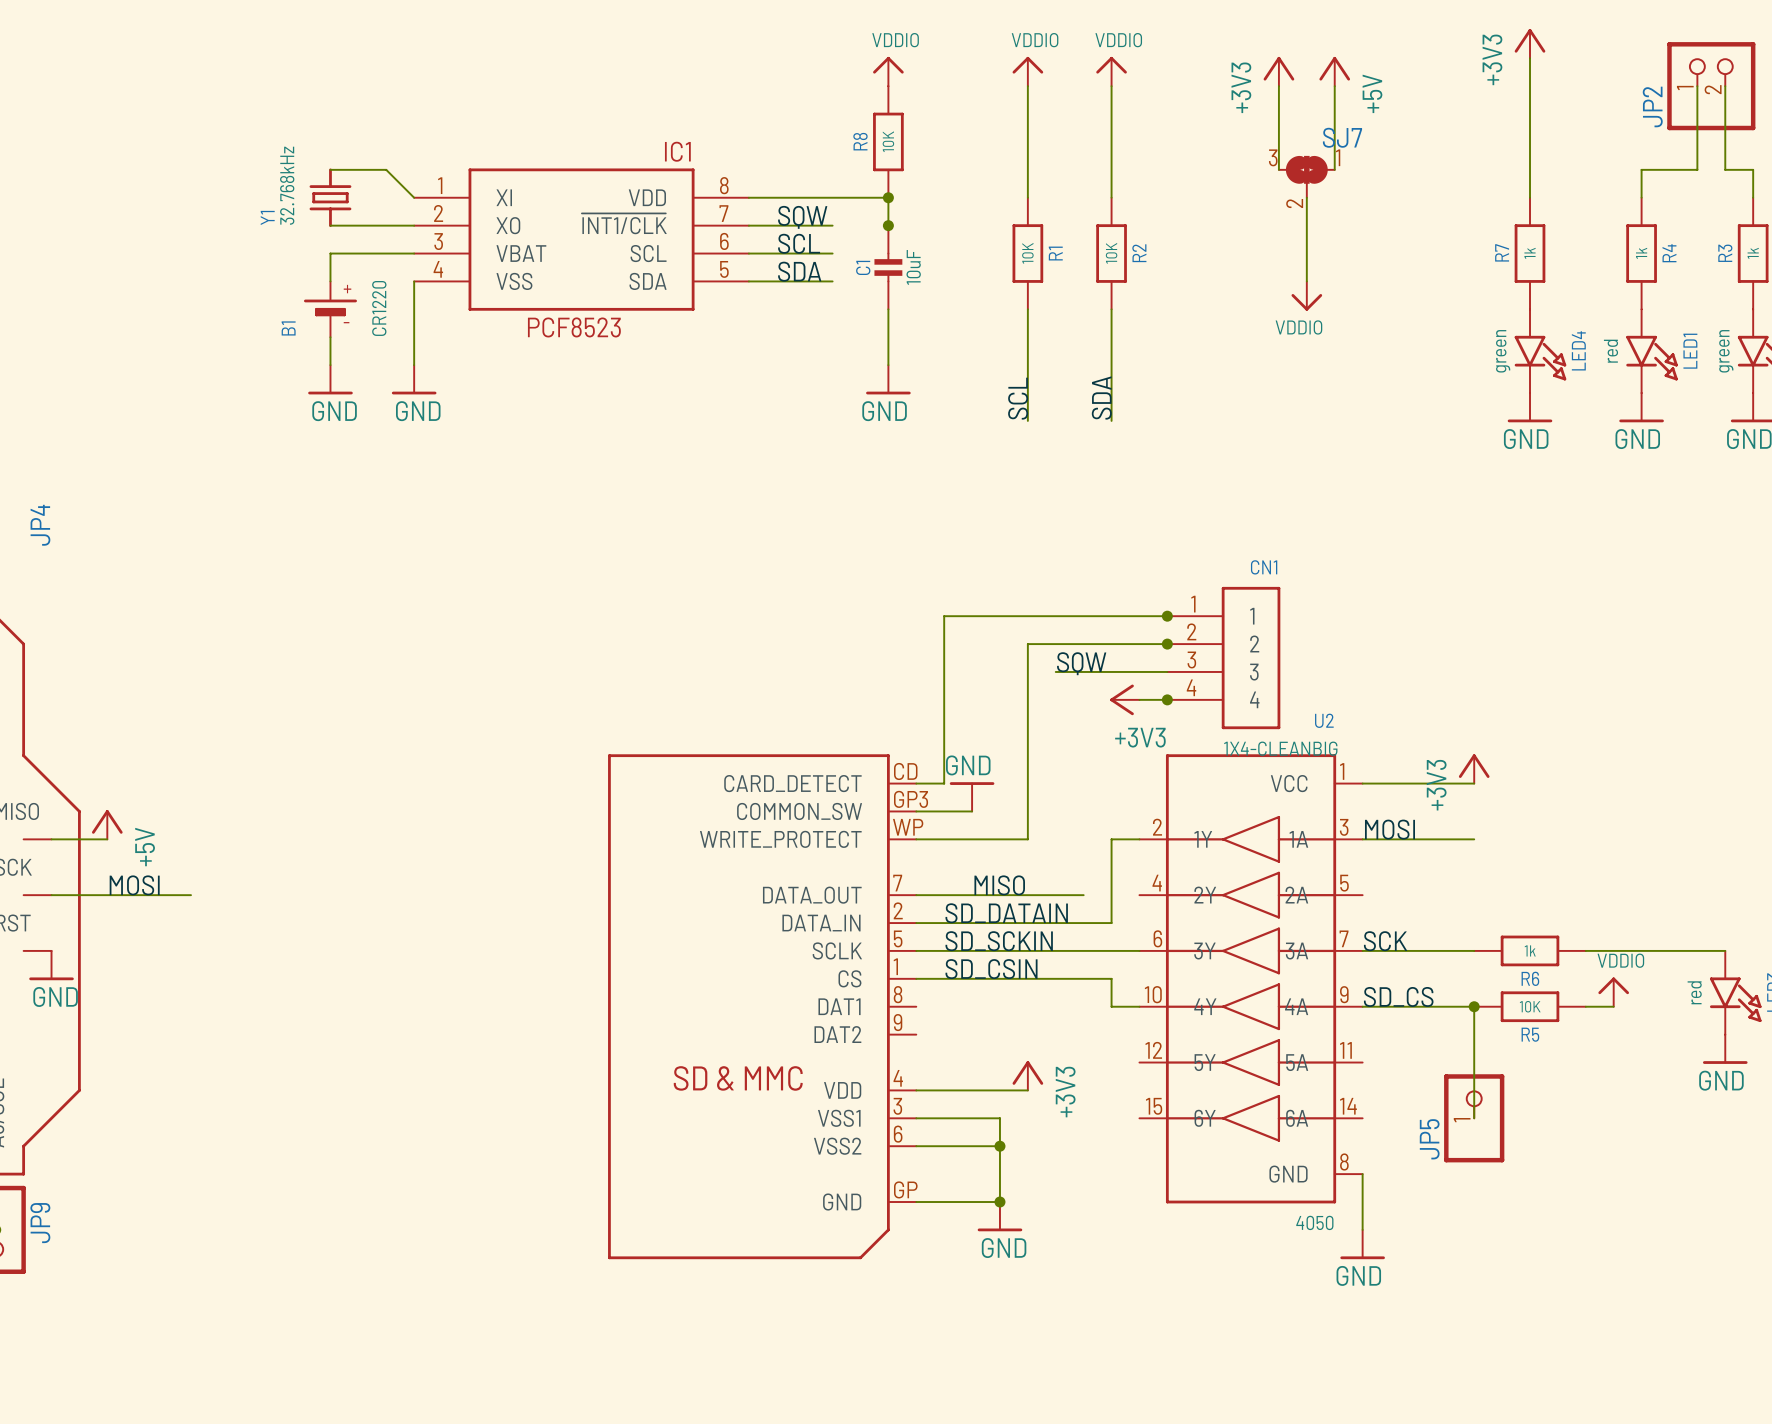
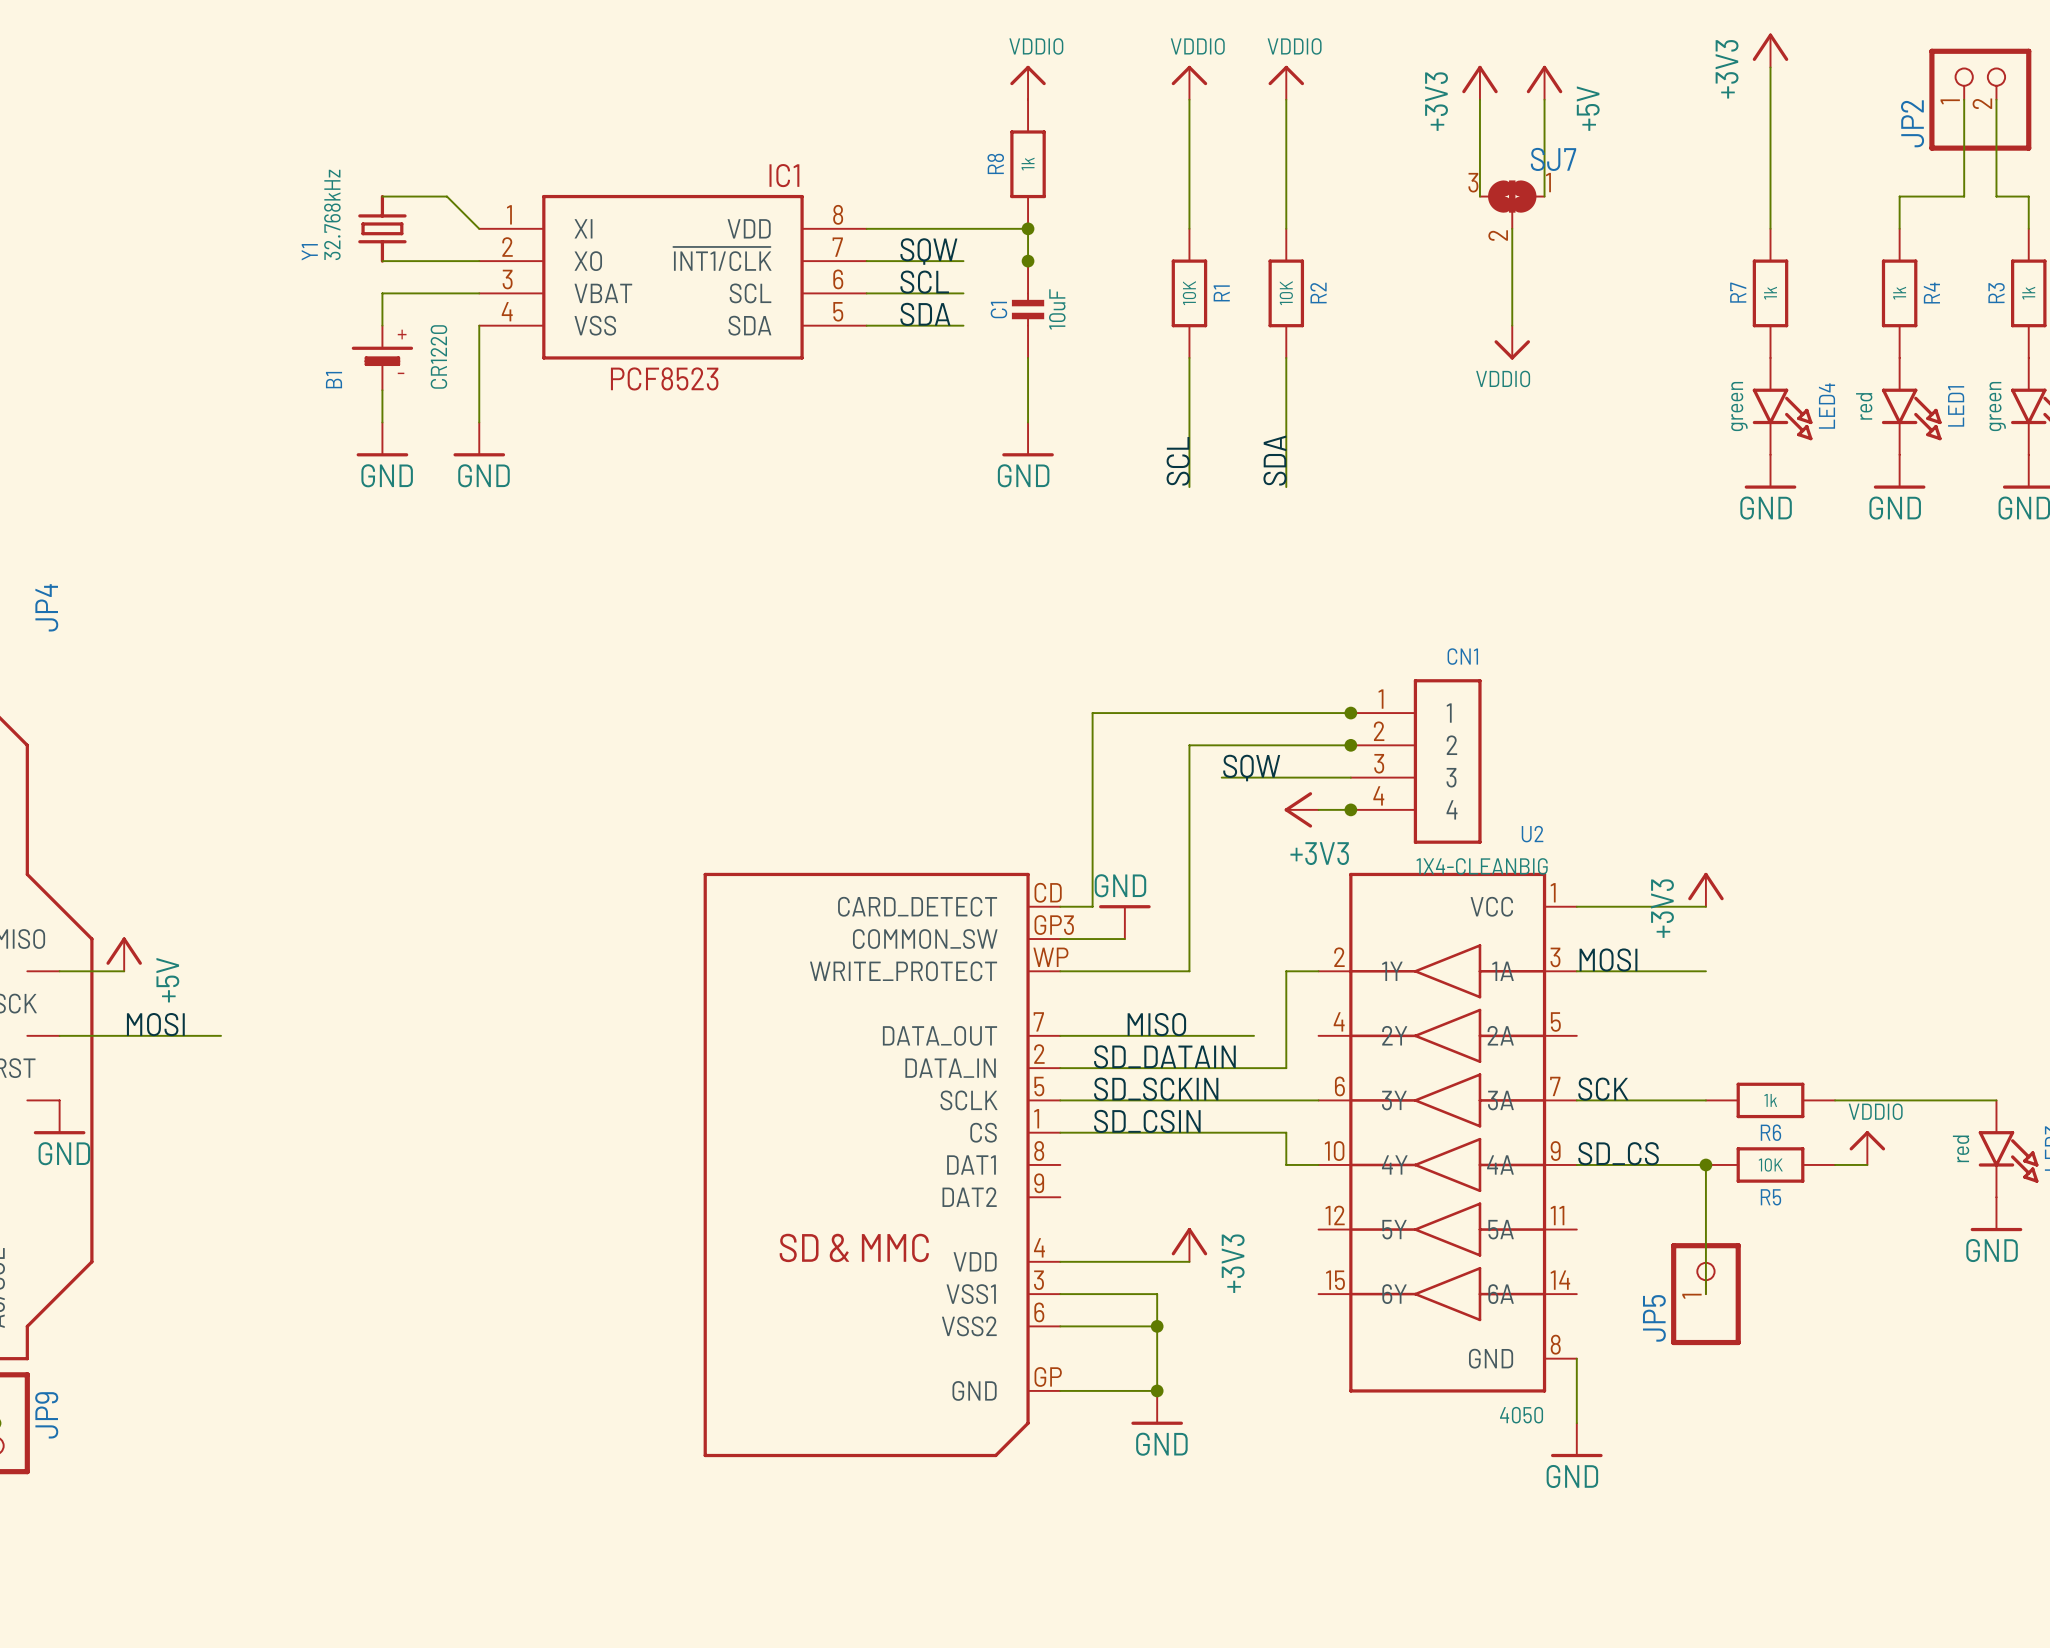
R8 value: 10K (888, 141) -> 1k (1028, 164)

